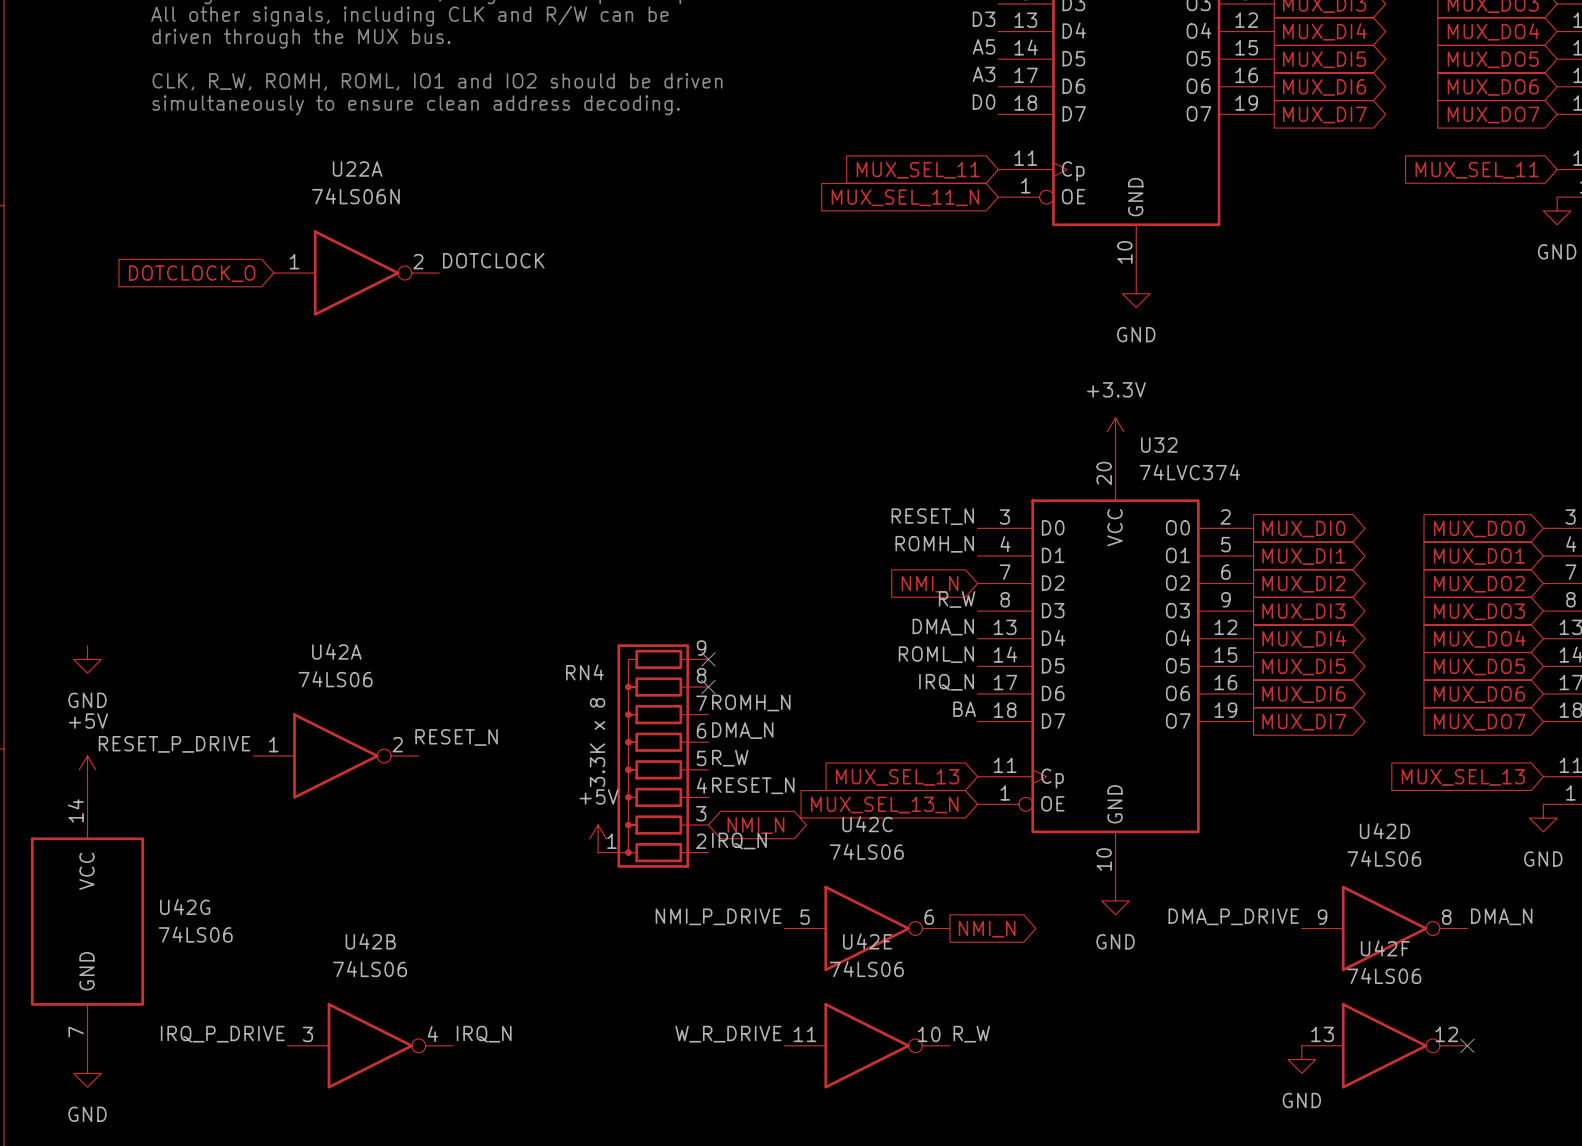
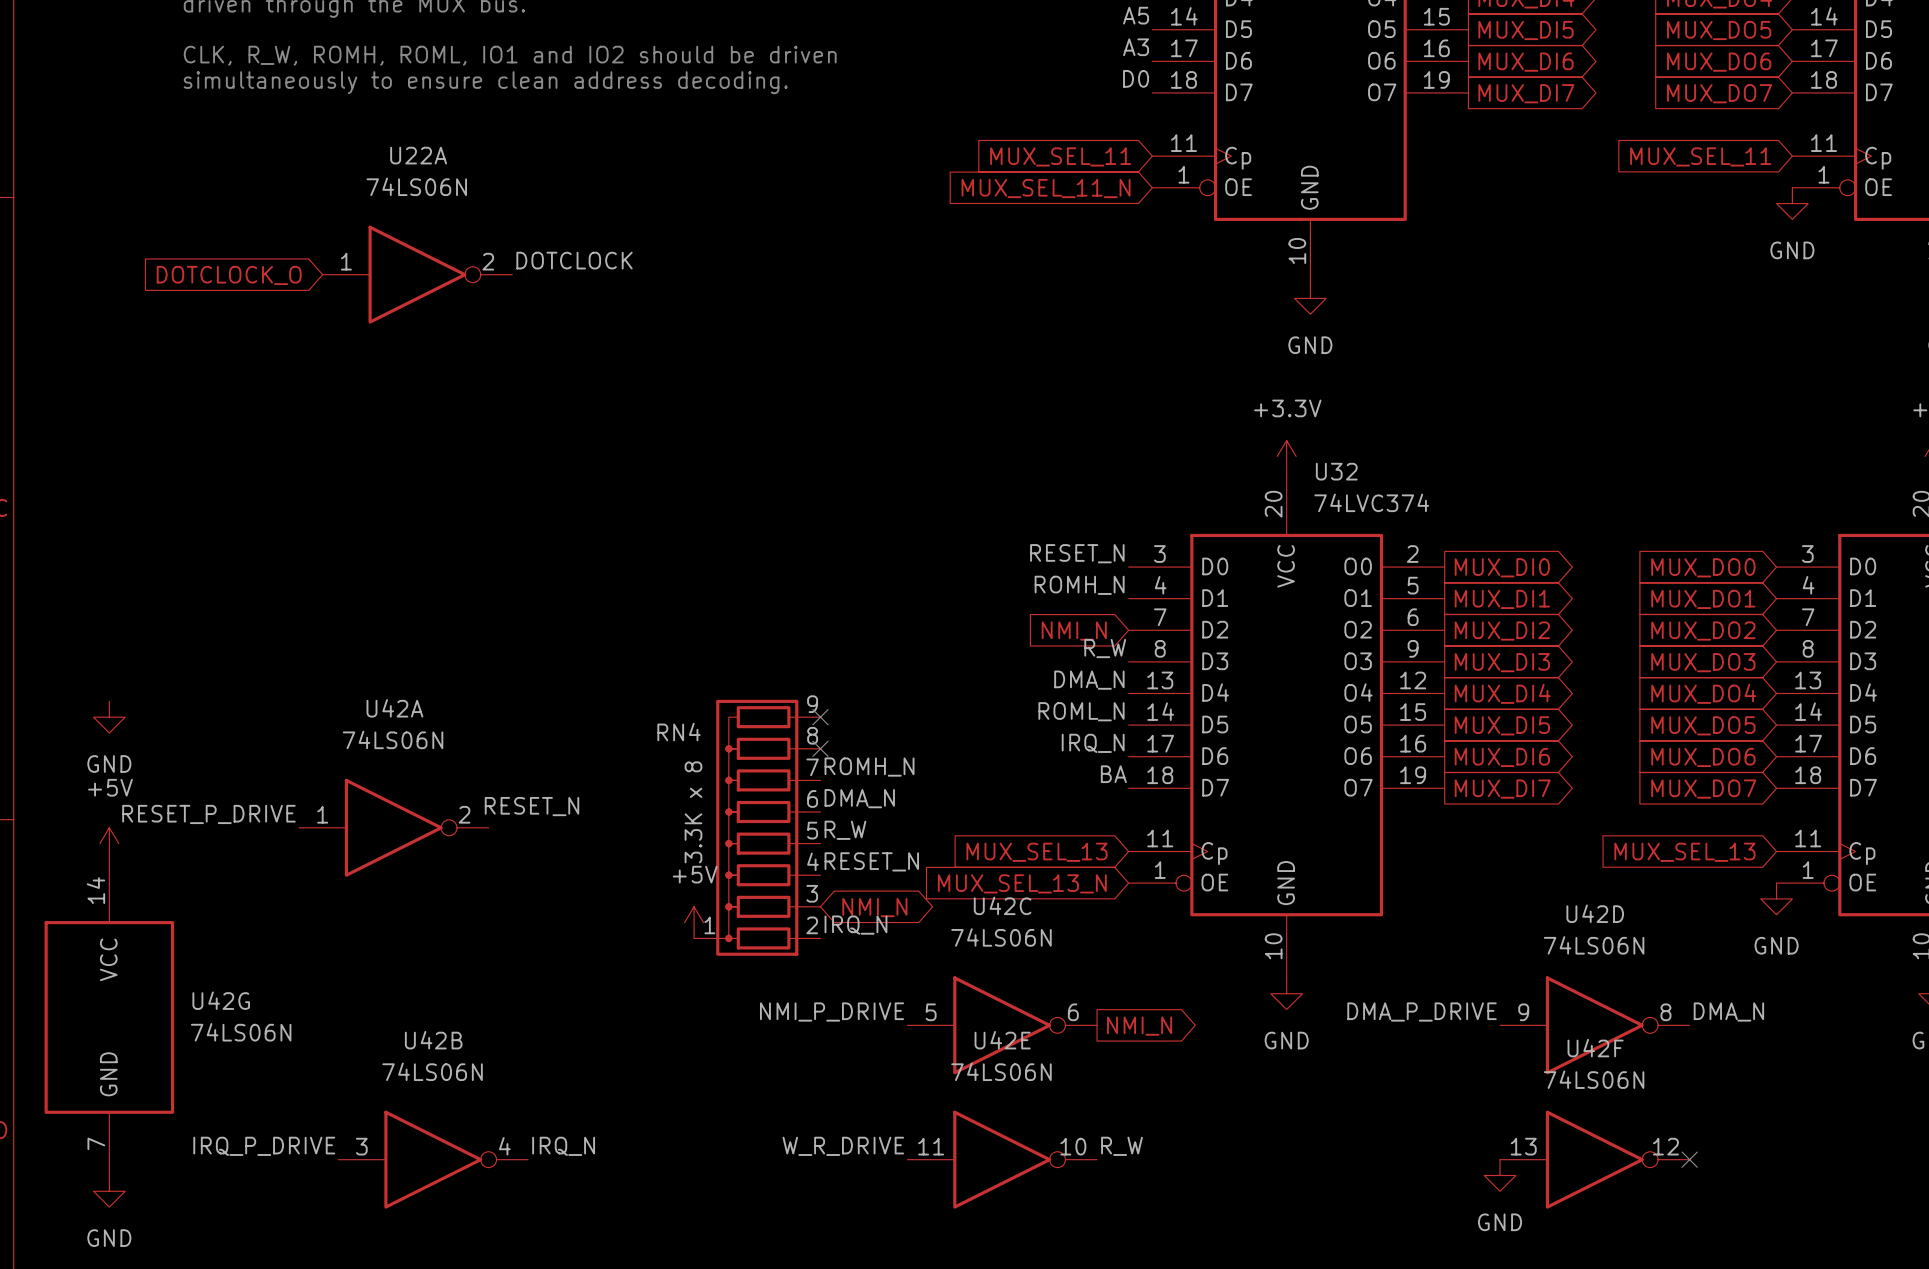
U42A value: 74LS06 (335, 679) -> 74LS06N (393, 739)
U42C value: 74LS06 (866, 851) -> 74LS06N (1001, 937)
U42D value: 74LS06 (1384, 858) -> 74LS06N (1594, 945)
U42G value: 74LS06 (195, 934) -> 74LS06N (241, 1032)
U42B value: 74LS06 (370, 969) -> 74LS06N (432, 1071)
U42E value: 74LS06 (866, 969) -> 74LS06N (1001, 1071)
U42F value: 74LS06 (1384, 975) -> 74LS06N (1594, 1079)

